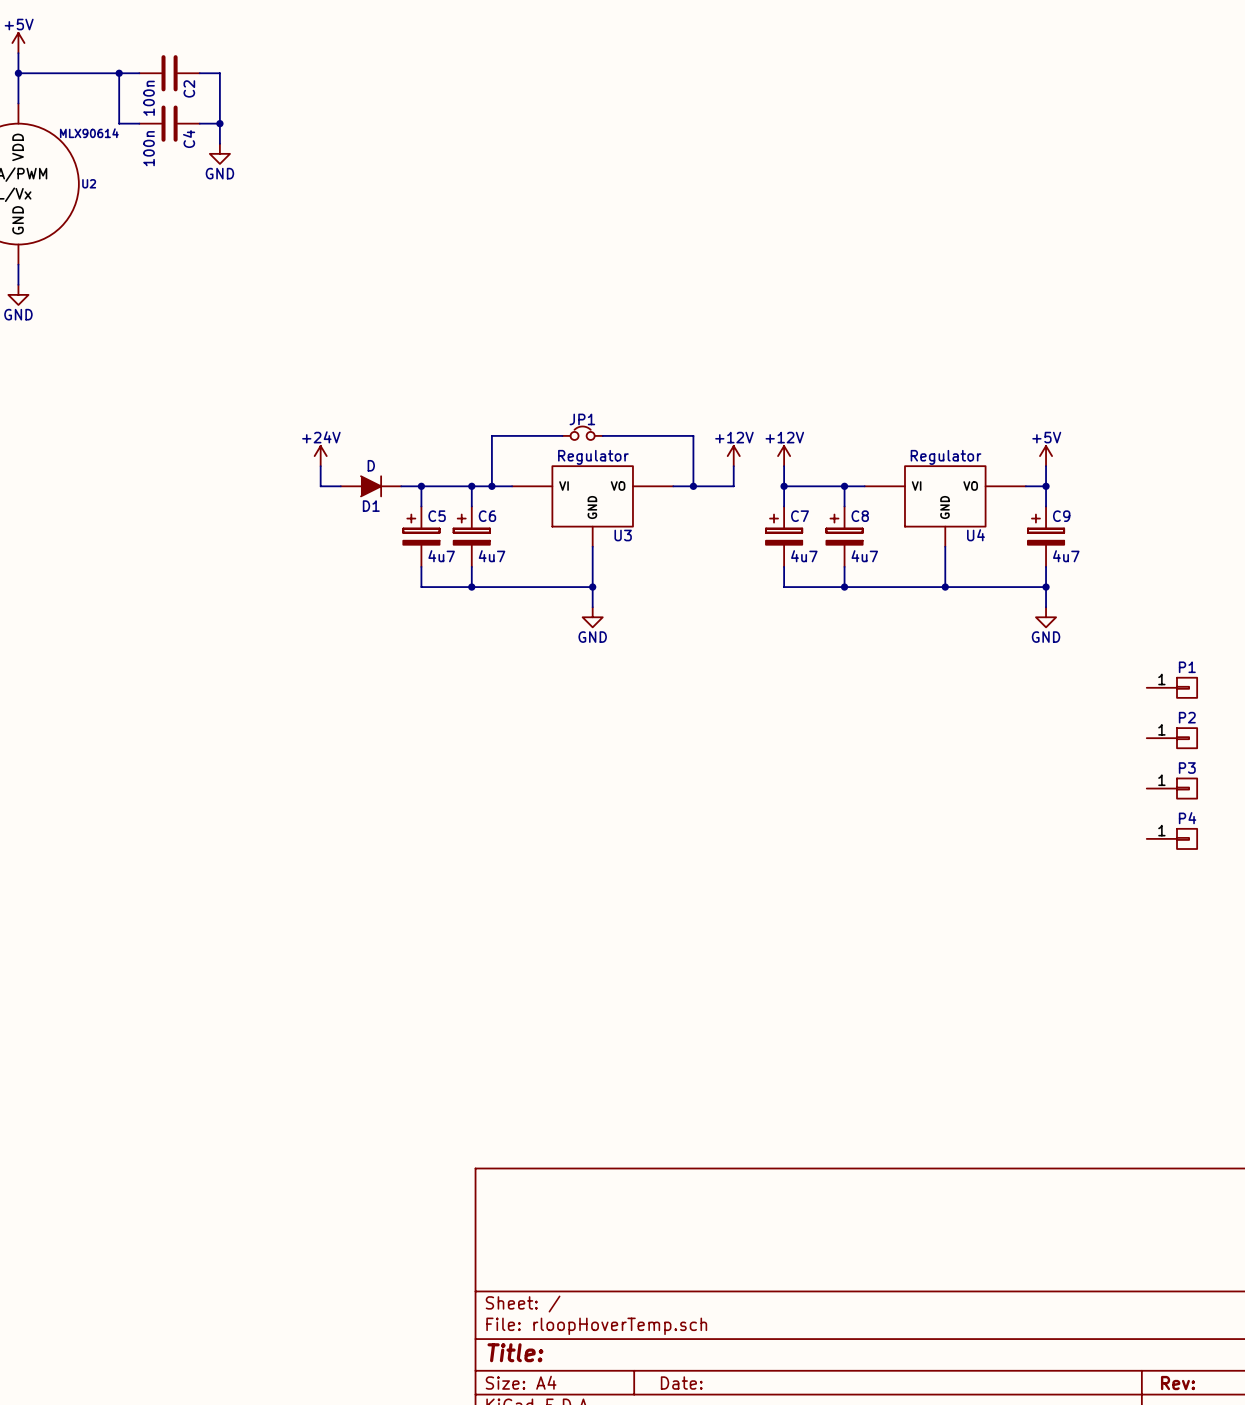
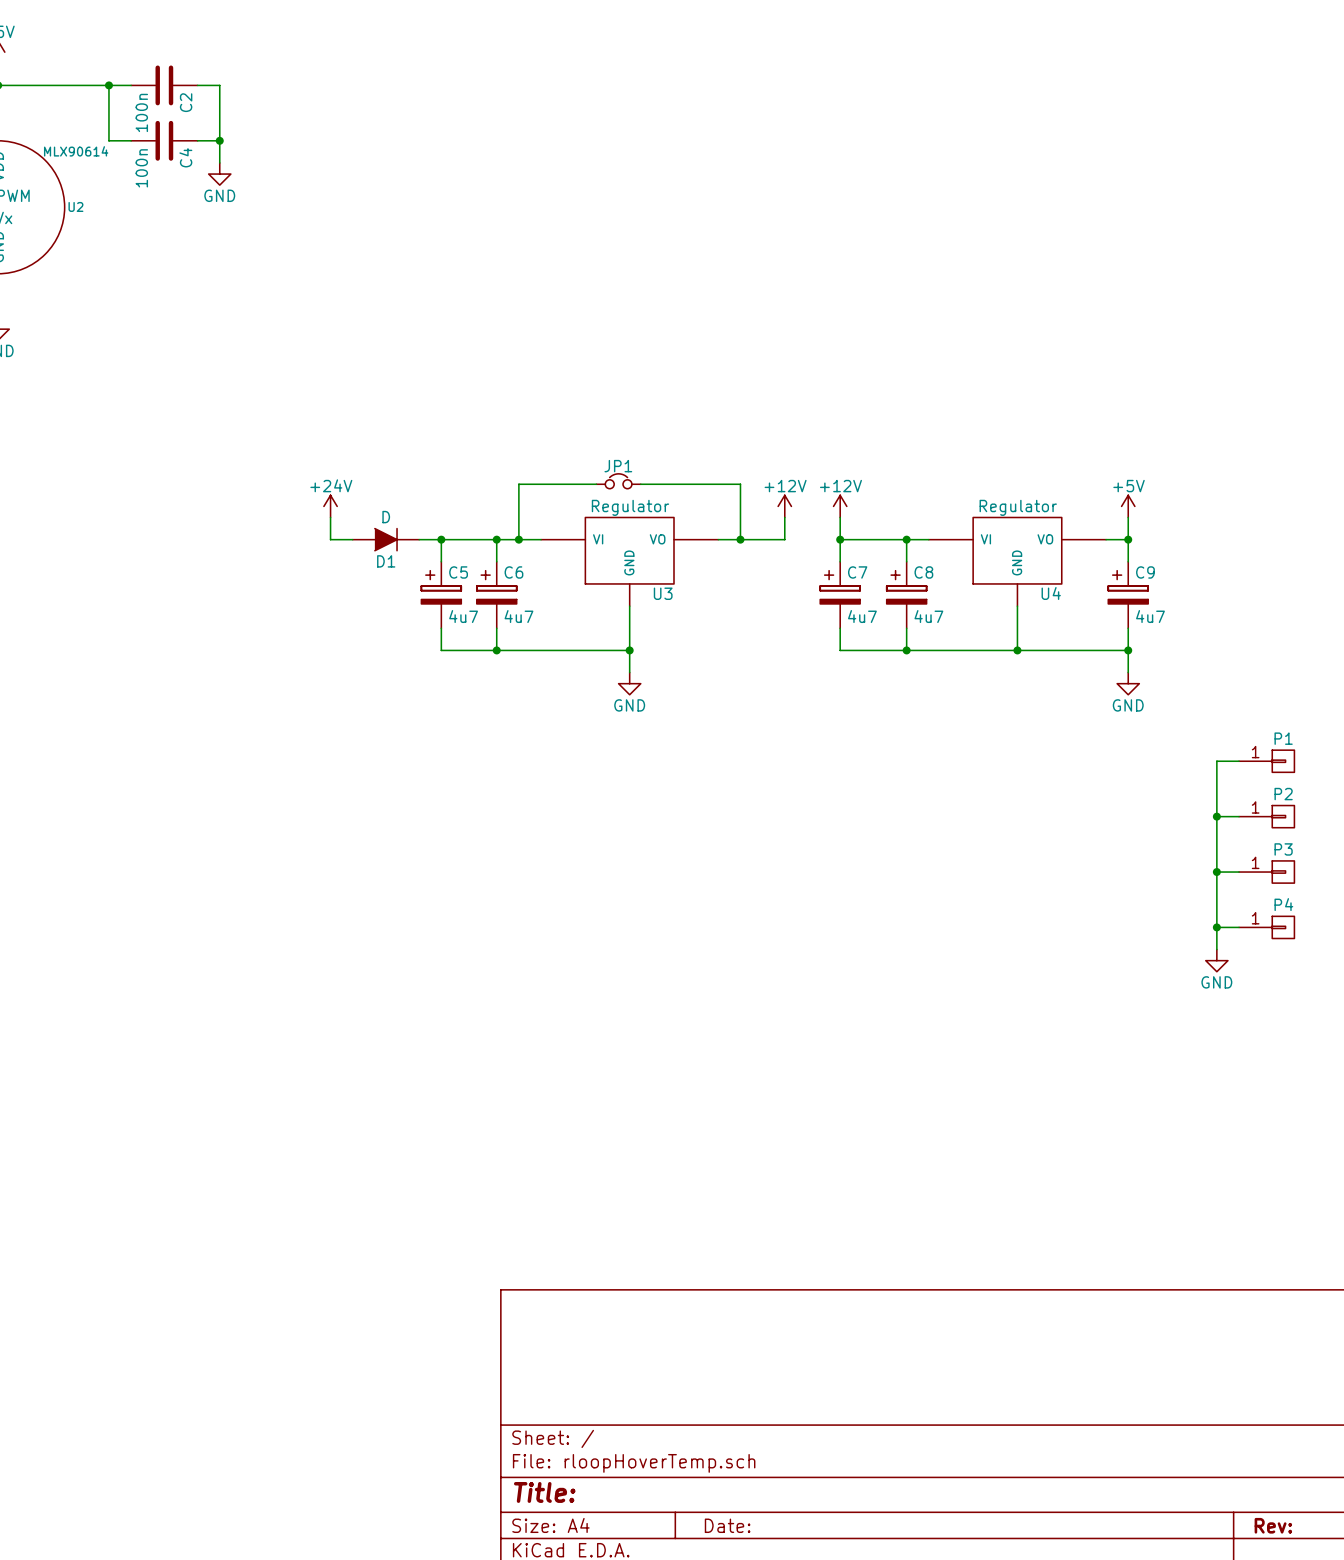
wire: none -> (1239, 761) (1216, 761) (1216, 949)
wire: none -> (1216, 816) (1239, 816)
junction: none -> (1216, 816)
wire: none -> (1216, 872) (1239, 872)
junction: none -> (1216, 872)
wire: none -> (1216, 927) (1239, 927)
junction: none -> (1216, 927)
power symbol: none -> GND (1216, 960)

